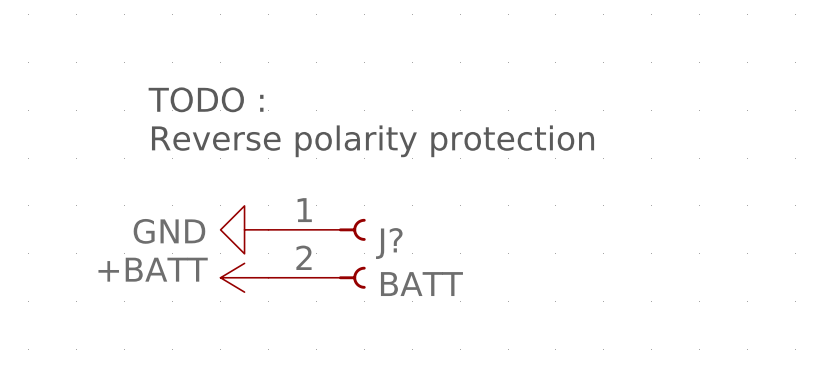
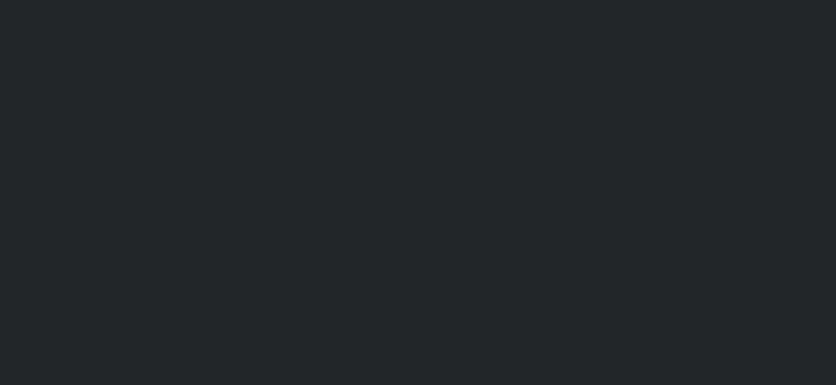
text: TODO : (206, 99) -> none
text: Reverse polarity protection (373, 141) -> none
power symbol: GND (244, 229) -> none
J?: BATT (317, 253) -> none
power symbol: +BATT (244, 277) -> none

